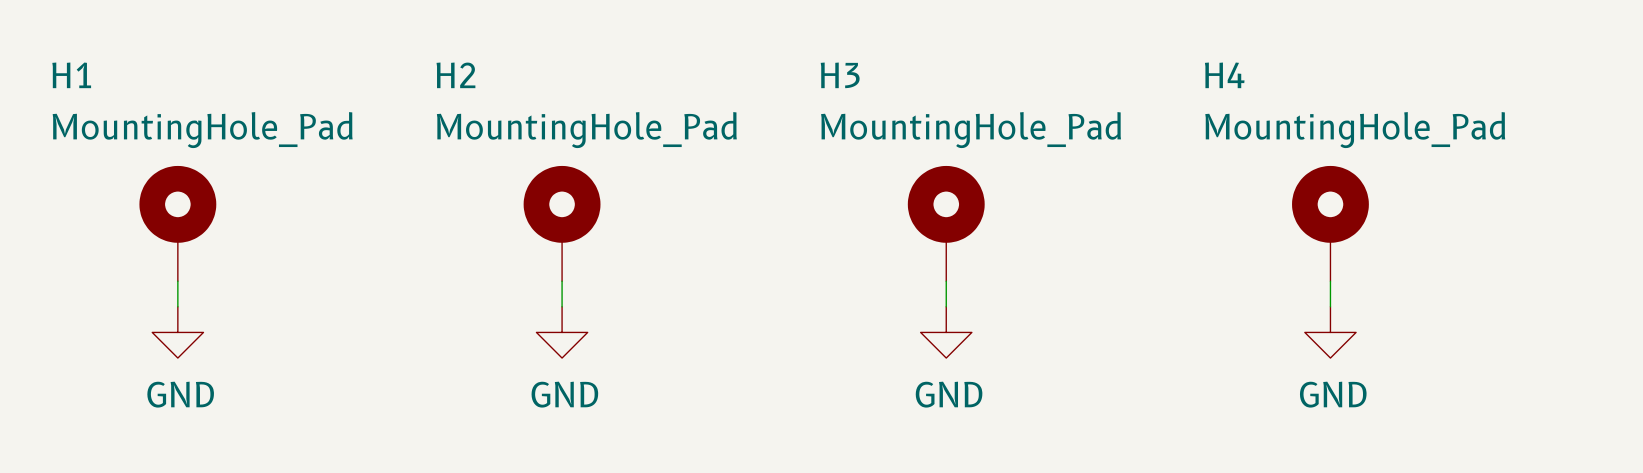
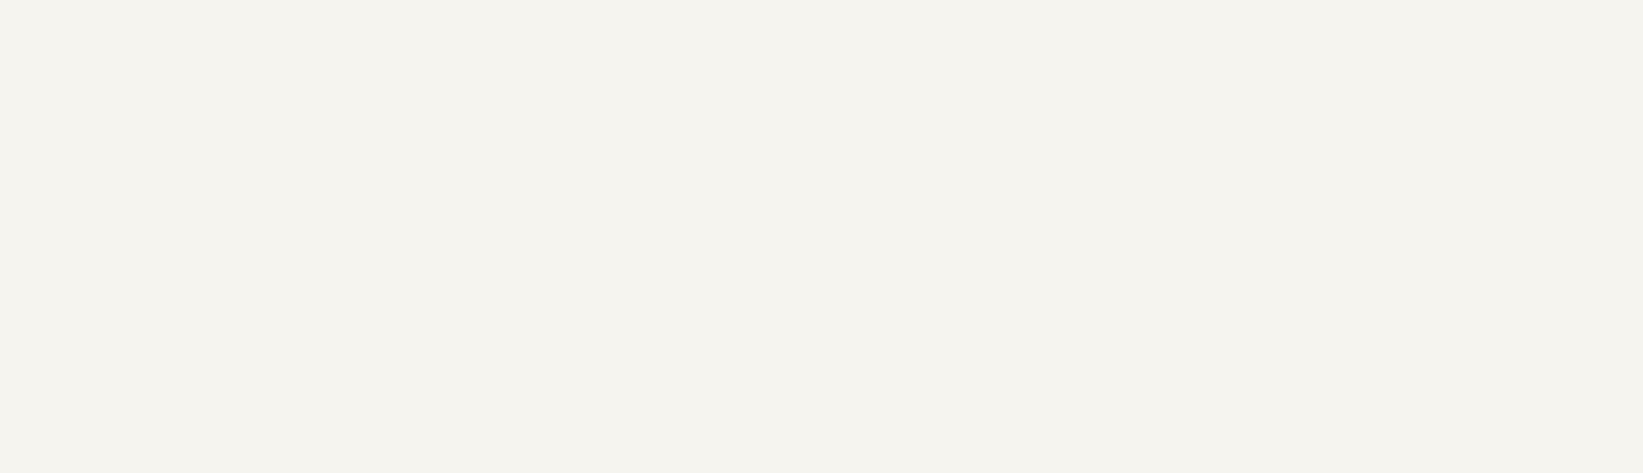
H1: MountingHole_Pad (177, 223) -> none
H2: MountingHole_Pad (562, 223) -> none
H3: MountingHole_Pad (946, 223) -> none
H4: MountingHole_Pad (1330, 223) -> none
wire: (177, 281) (177, 306) -> none
wire: (562, 281) (562, 306) -> none
wire: (946, 281) (946, 306) -> none
wire: (1330, 281) (1330, 306) -> none
power symbol: GND (177, 332) -> none
power symbol: GND (562, 332) -> none
power symbol: GND (946, 332) -> none
power symbol: GND (1330, 332) -> none

